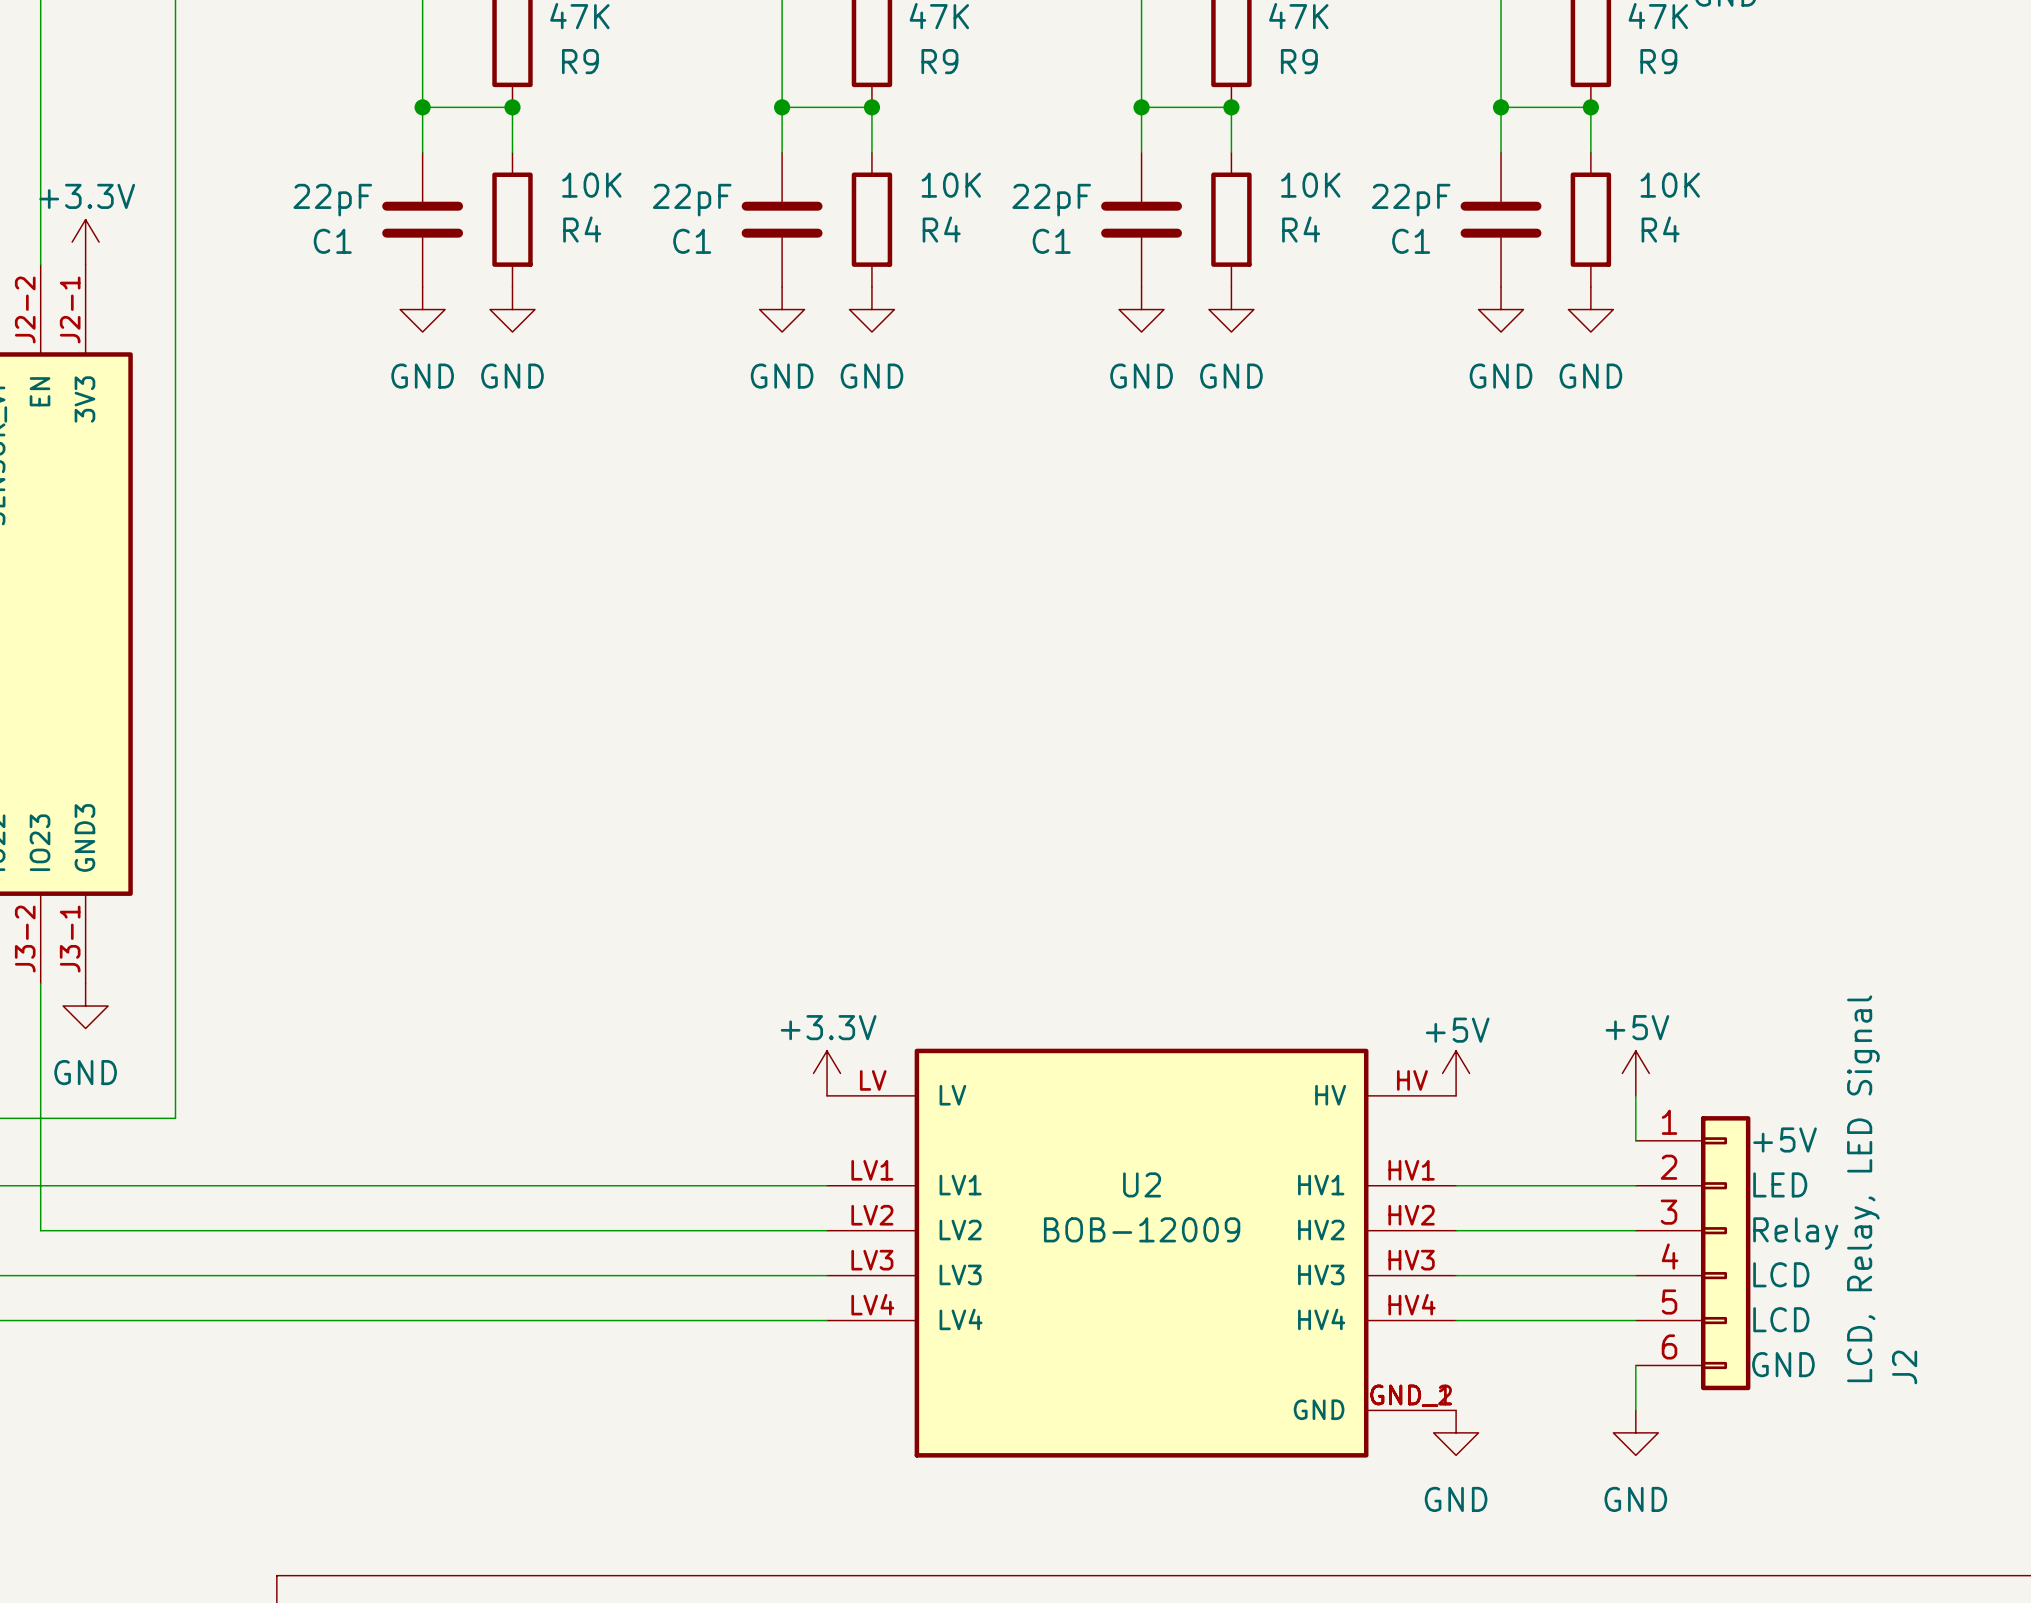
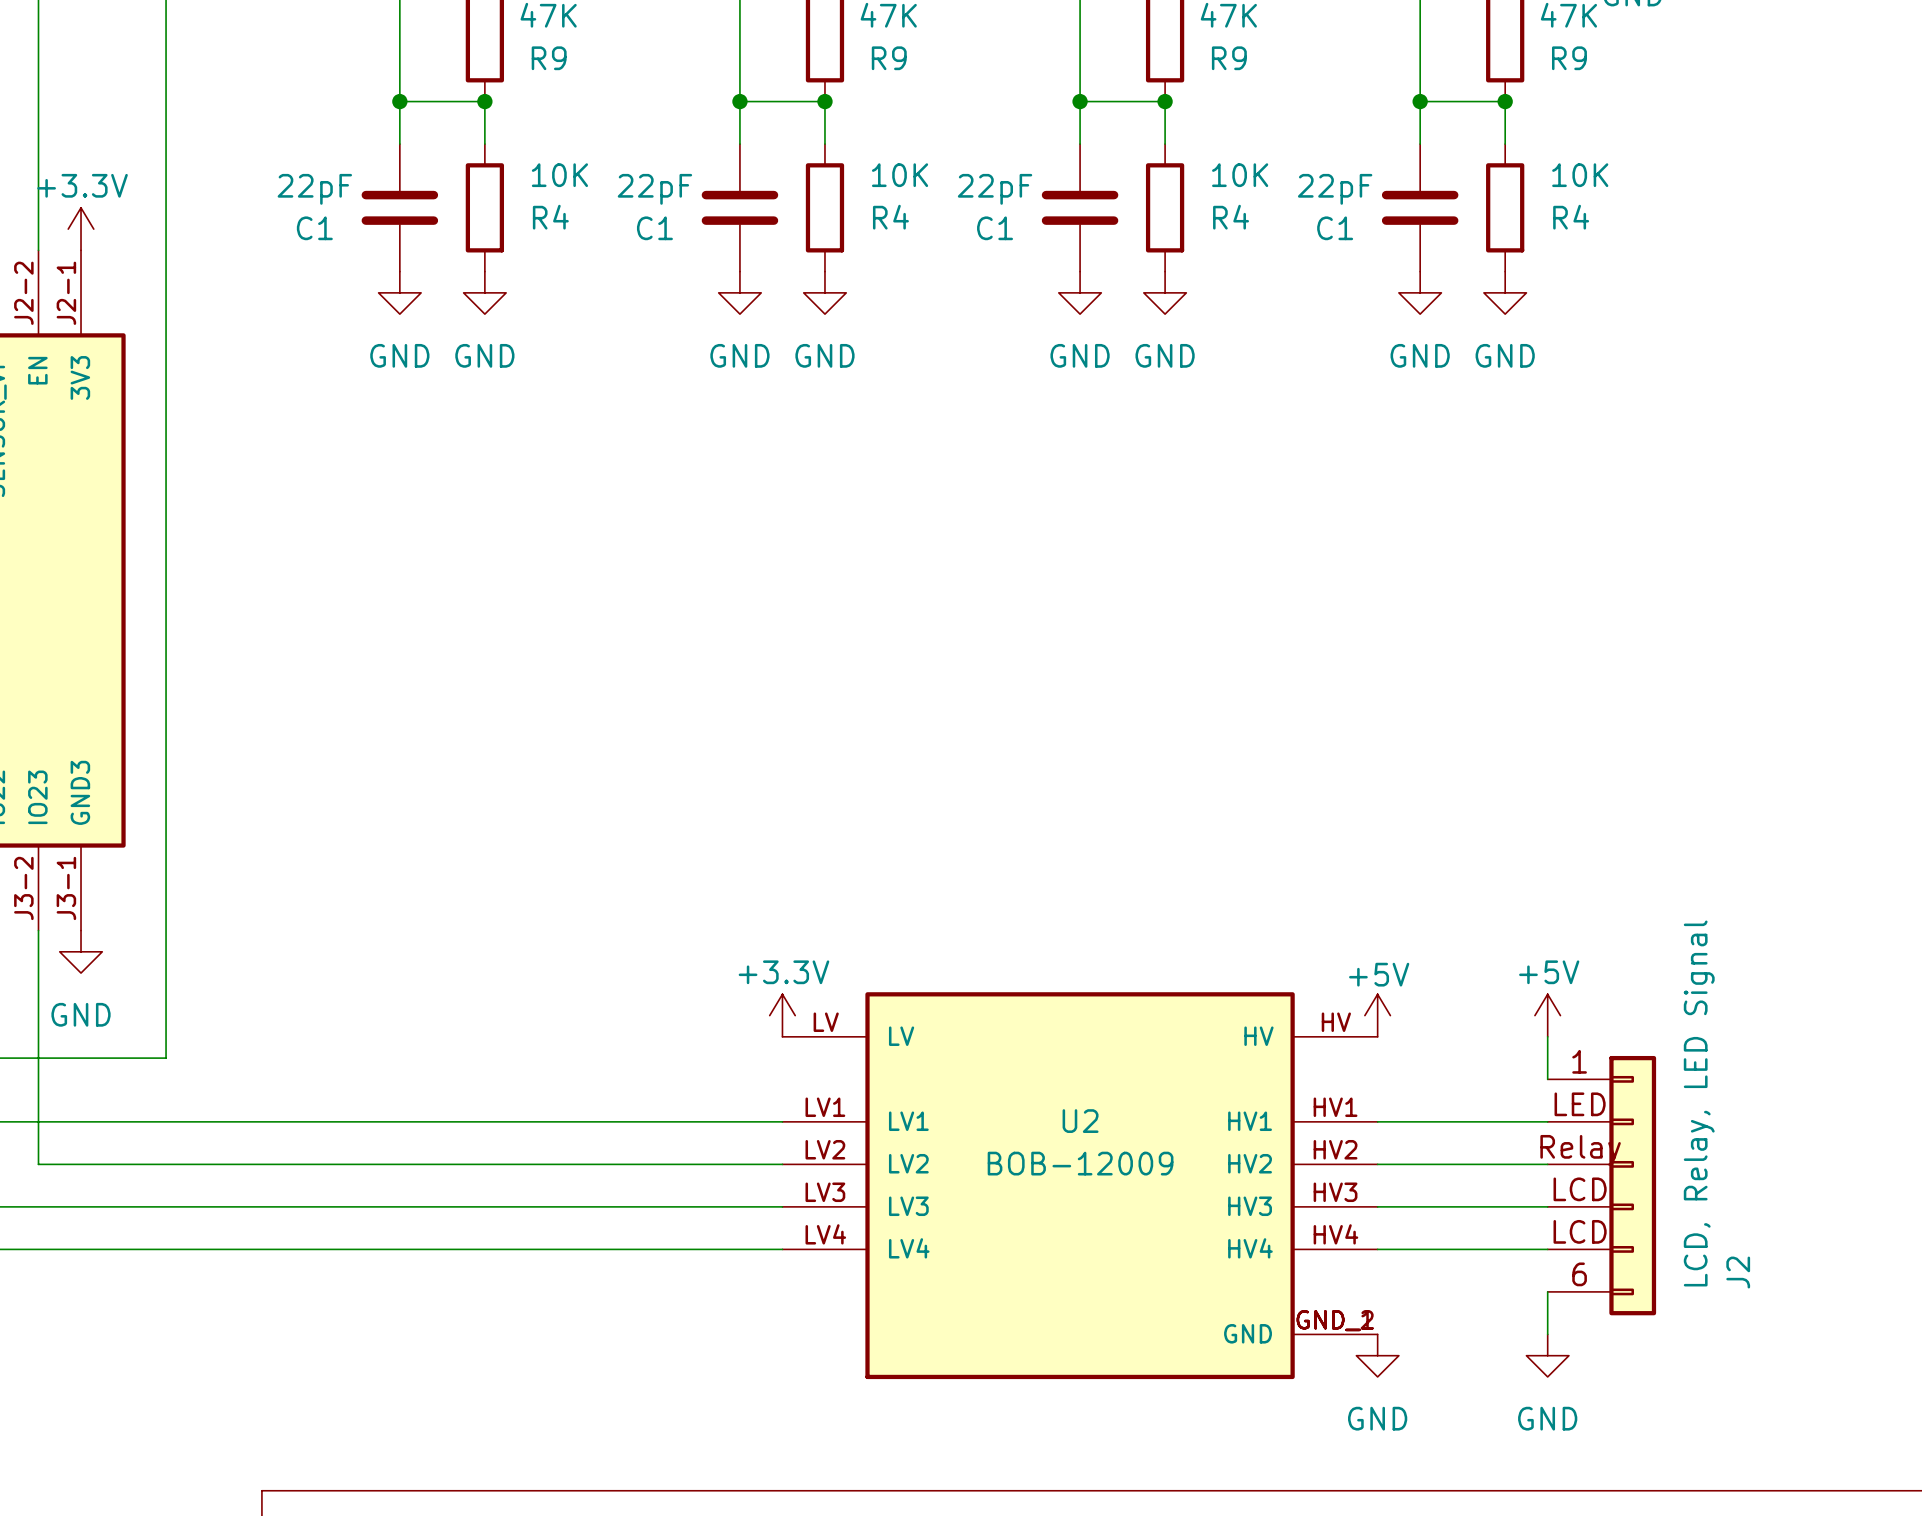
J2 symbol: [1635, 1116, 1751, 1391] -> [1547, 1055, 1657, 1316]
J2 value position: LCD, Relay, LED Signal (1863, 1188) -> LCD, Relay, LED Signal (1699, 1103)
J2 name position: J2 (1904, 1367) -> J2 (1738, 1272)

